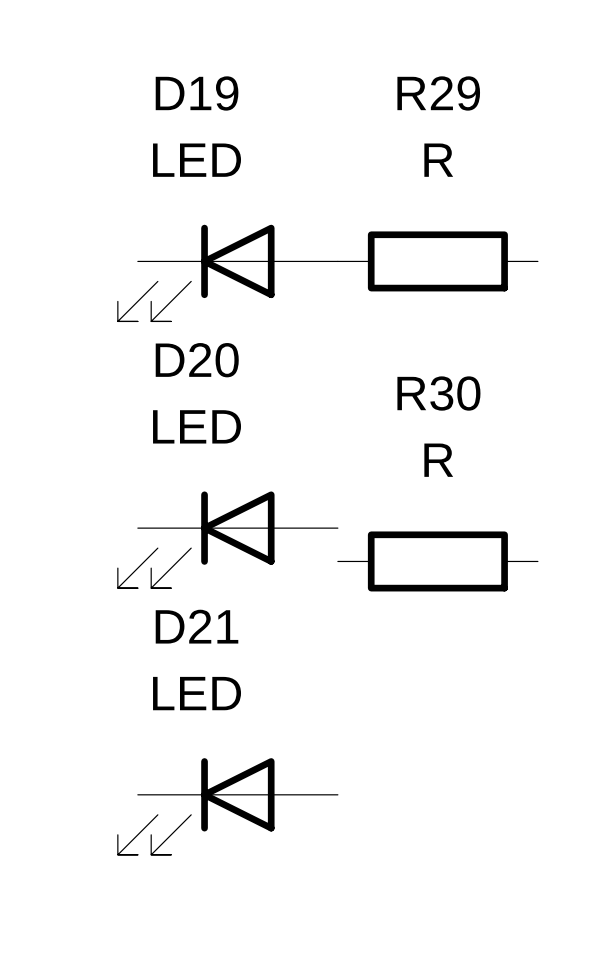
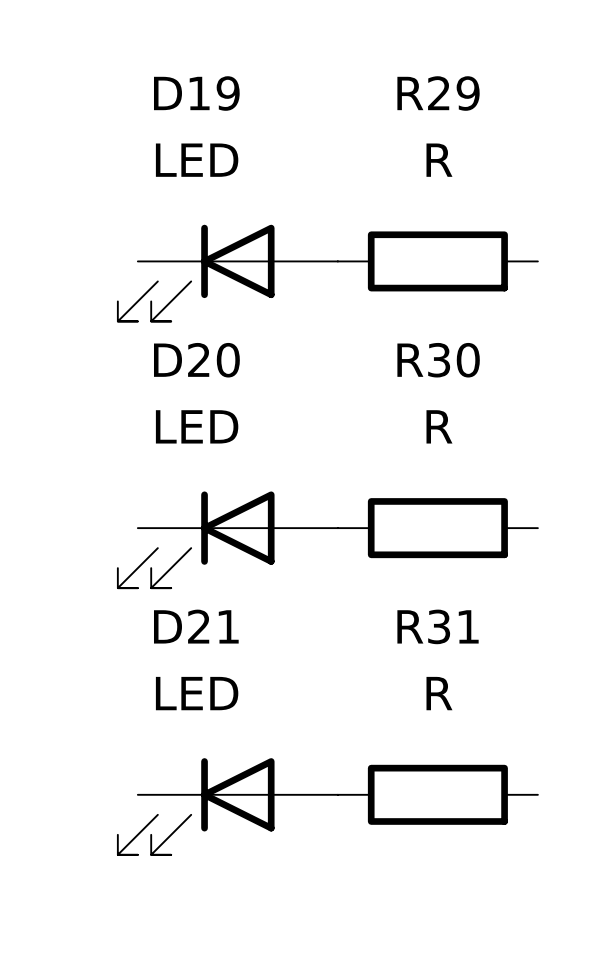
R30 position: (437, 561) -> (437, 528)
R31: none -> R (437, 794)

